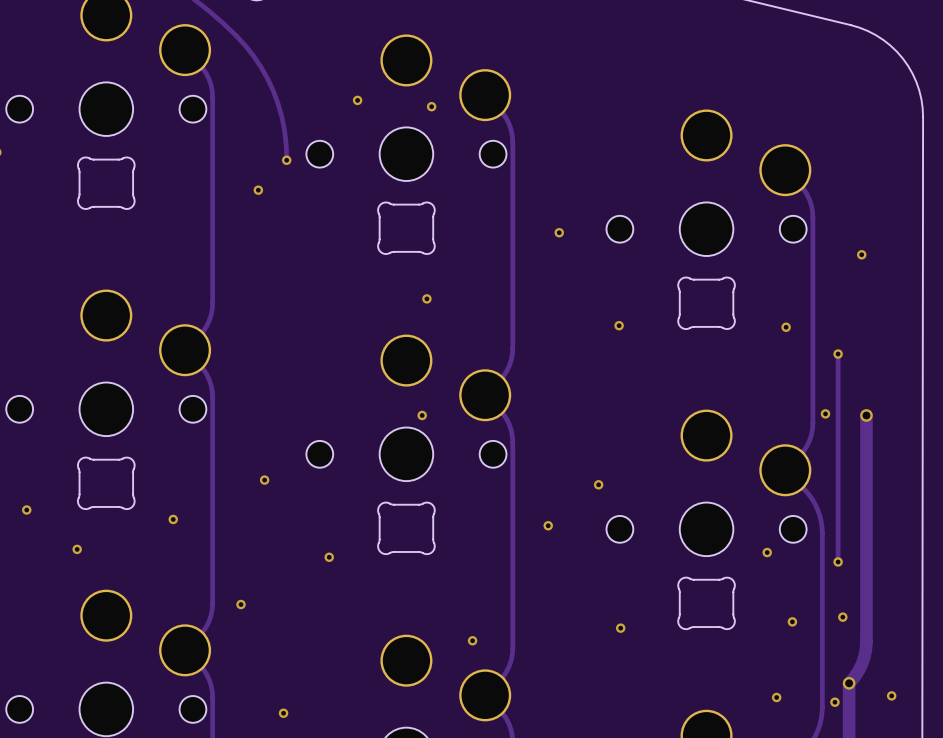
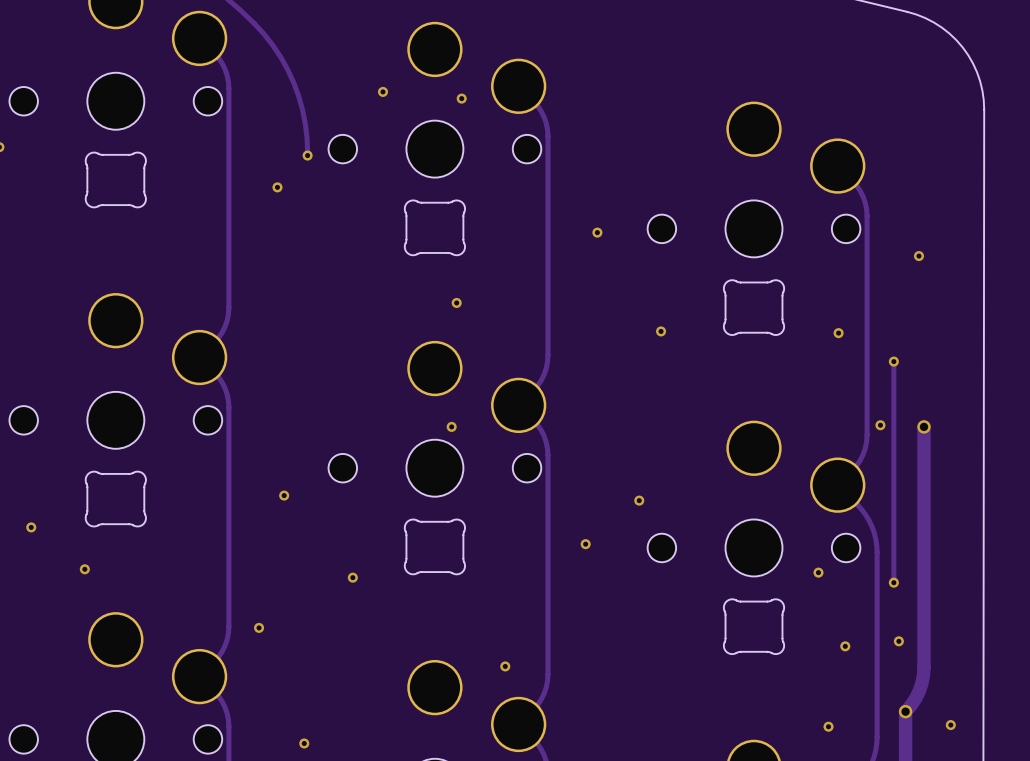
via: (173, 519) -> none
via: (620, 628) -> none
via: (834, 702) -> none

